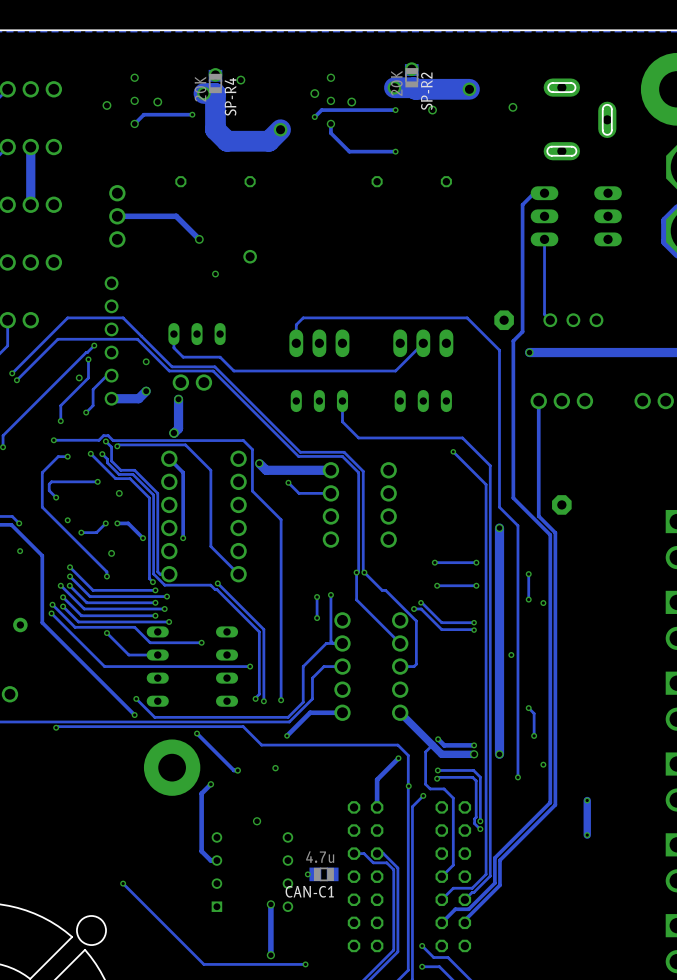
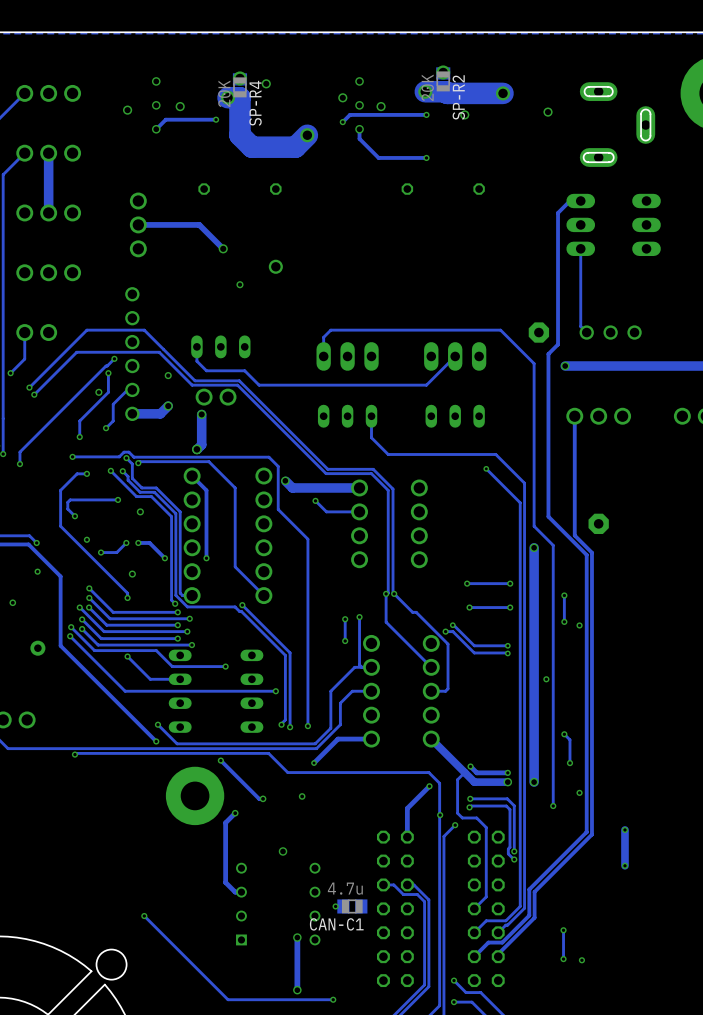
track: none -> (563, 930) (563, 959)
via: none -> (563, 930)
via: none -> (563, 959)
via: none -> (581, 960)

